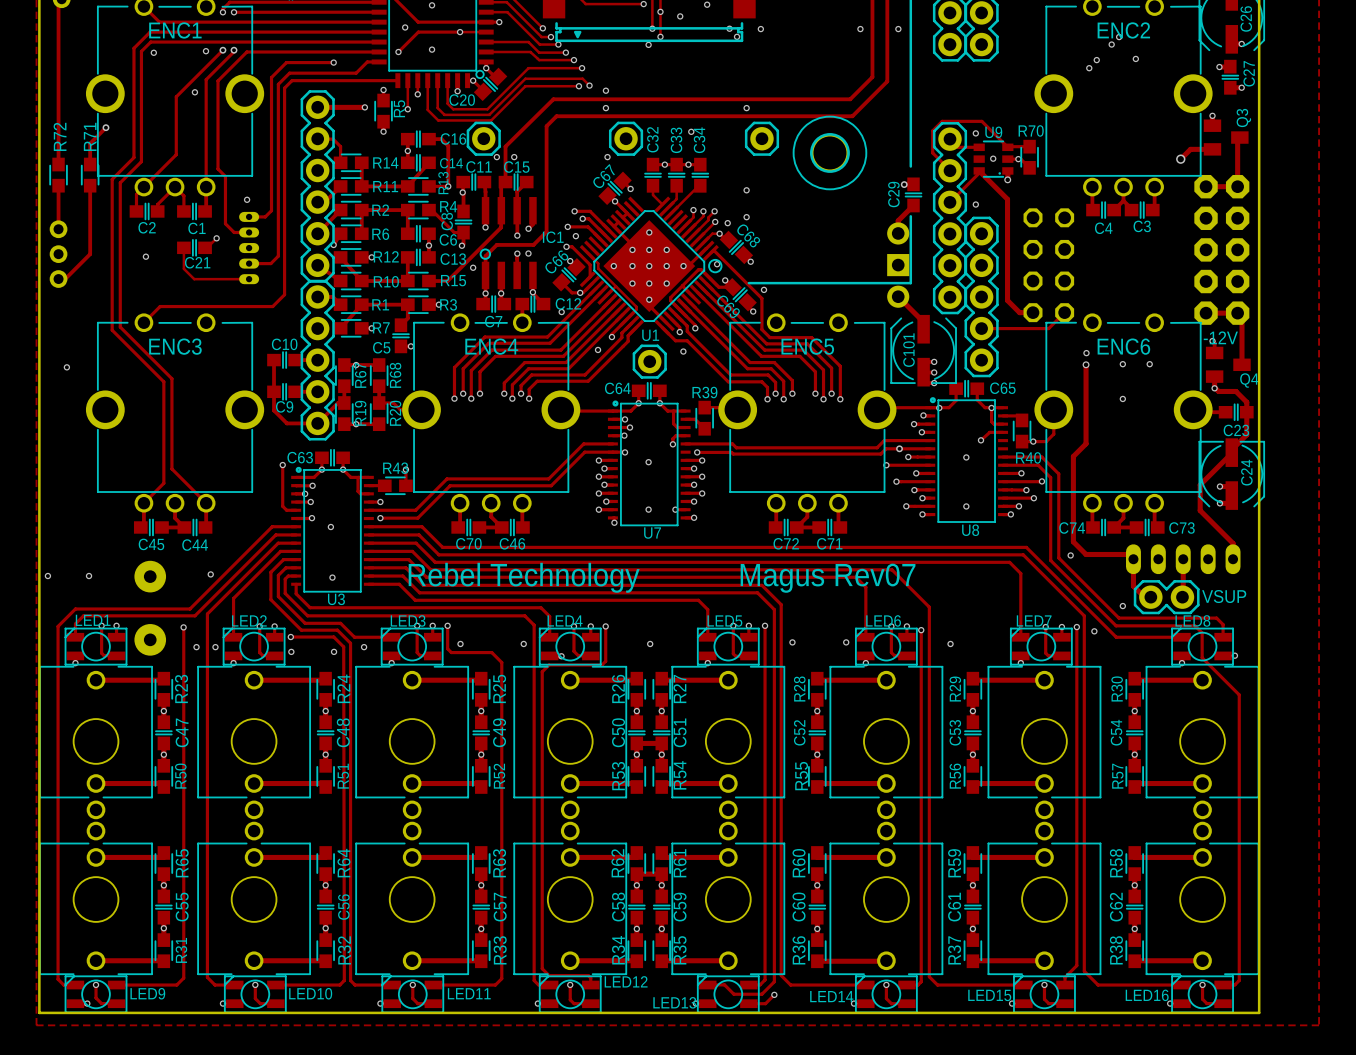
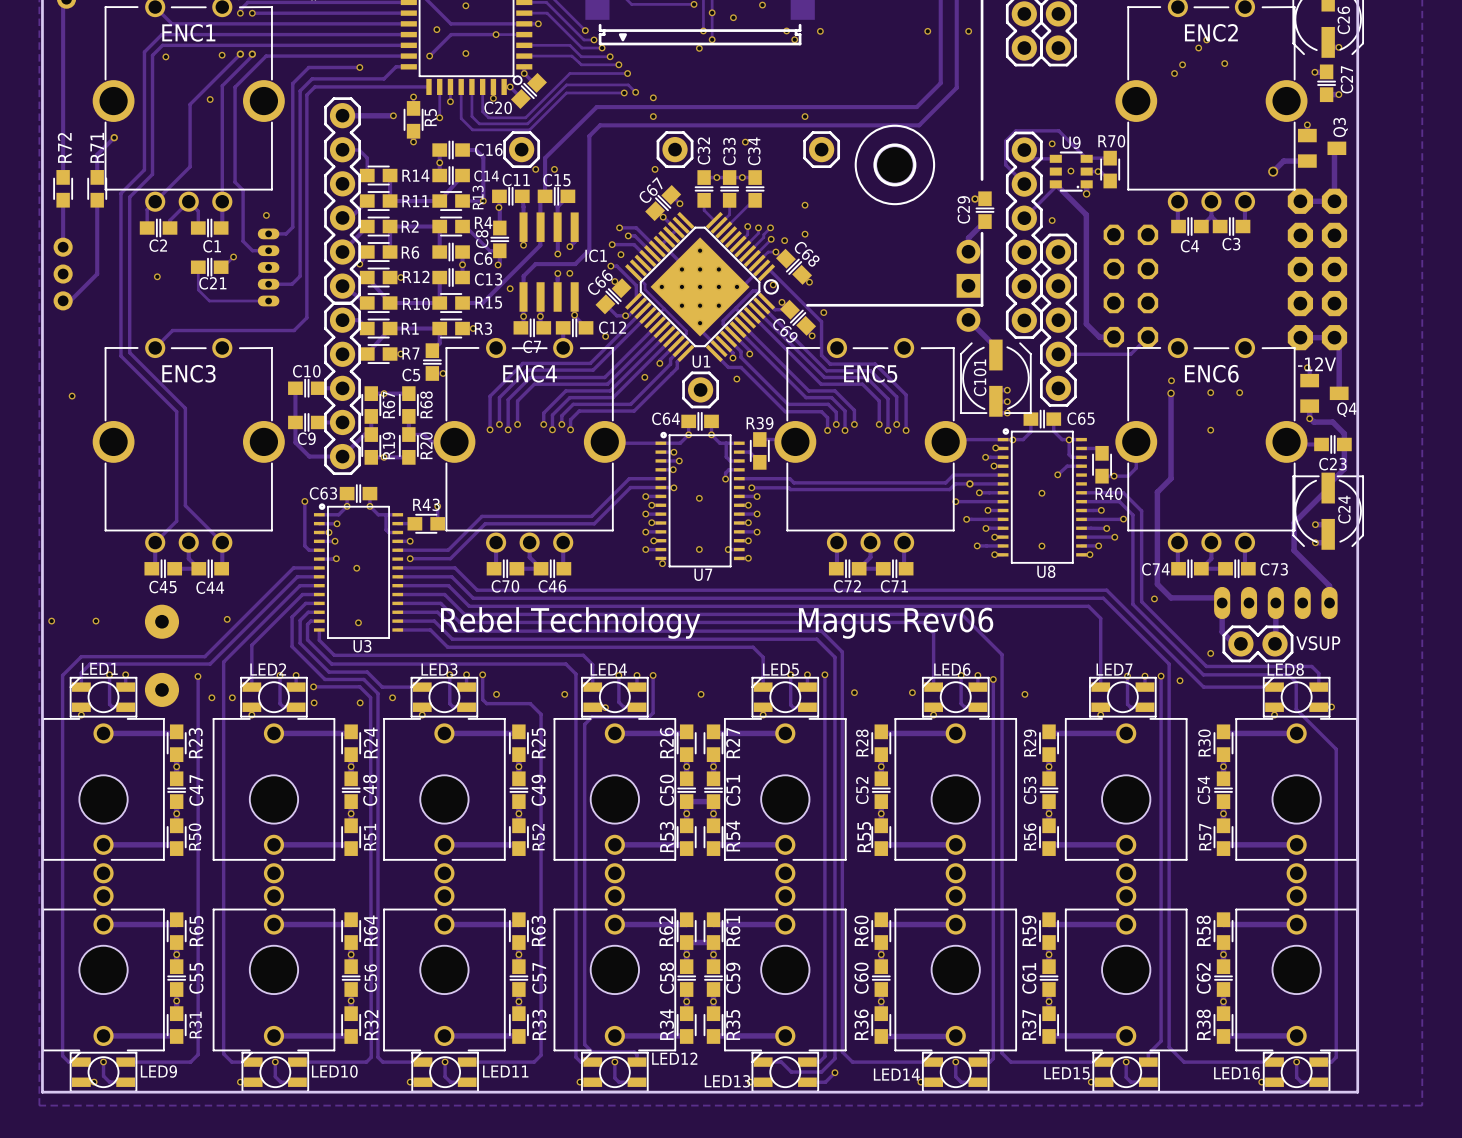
drawing: [479, 248, 492, 260] -> none
text: Magus Rev07 (828, 578) -> Magus Rev06 (896, 623)

